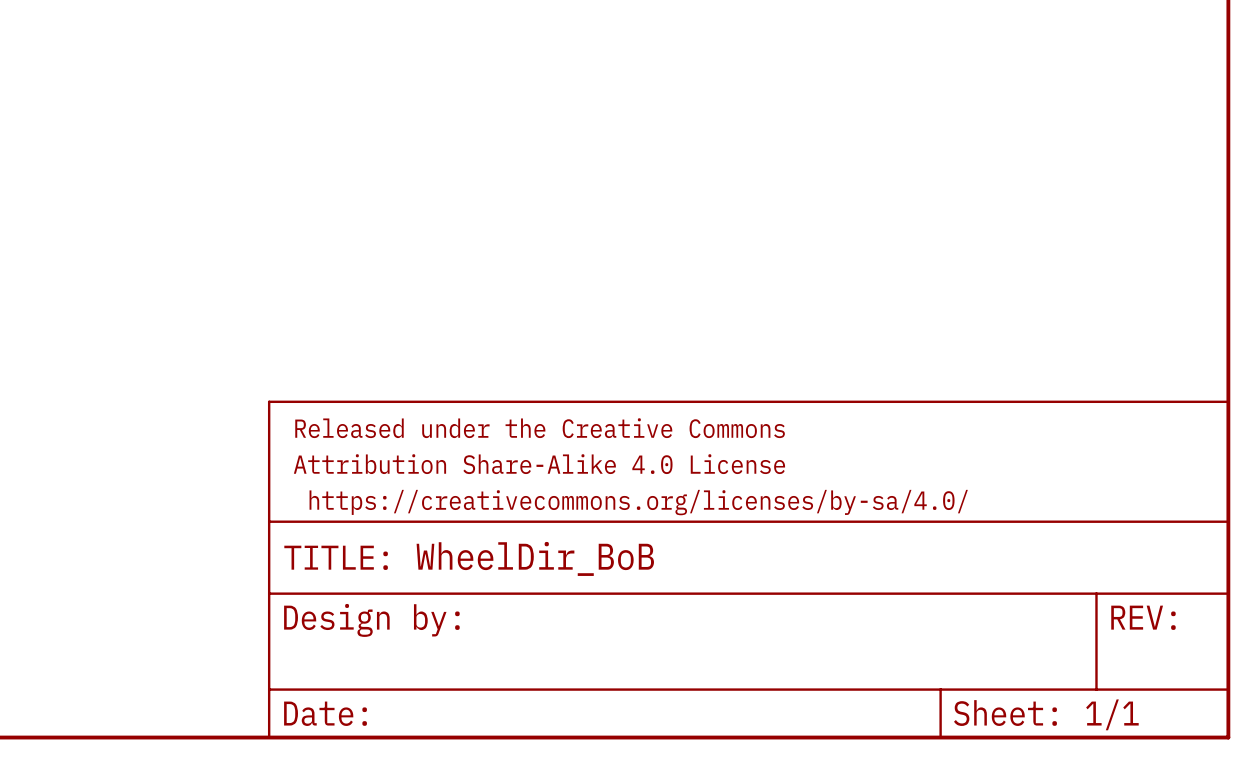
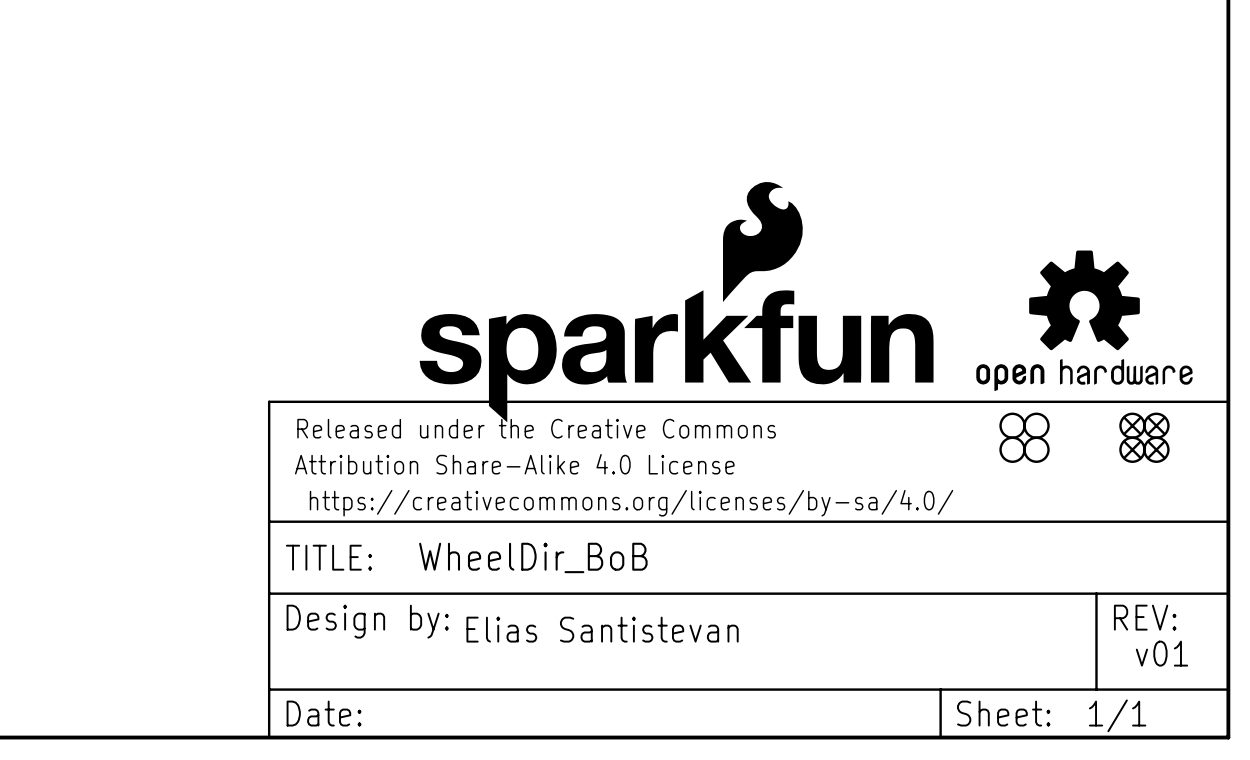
part: none -> (676, 302)
part: none -> (1084, 320)
part: none -> (1012, 425)
part: none -> (1036, 425)
part: none -> (1132, 425)
part: none -> (1156, 425)
part: none -> (1012, 449)
part: none -> (1036, 449)
part: none -> (1132, 449)
part: none -> (1156, 449)
text: none -> Elias Santistevan (602, 629)
text: none -> v01 (1161, 653)

